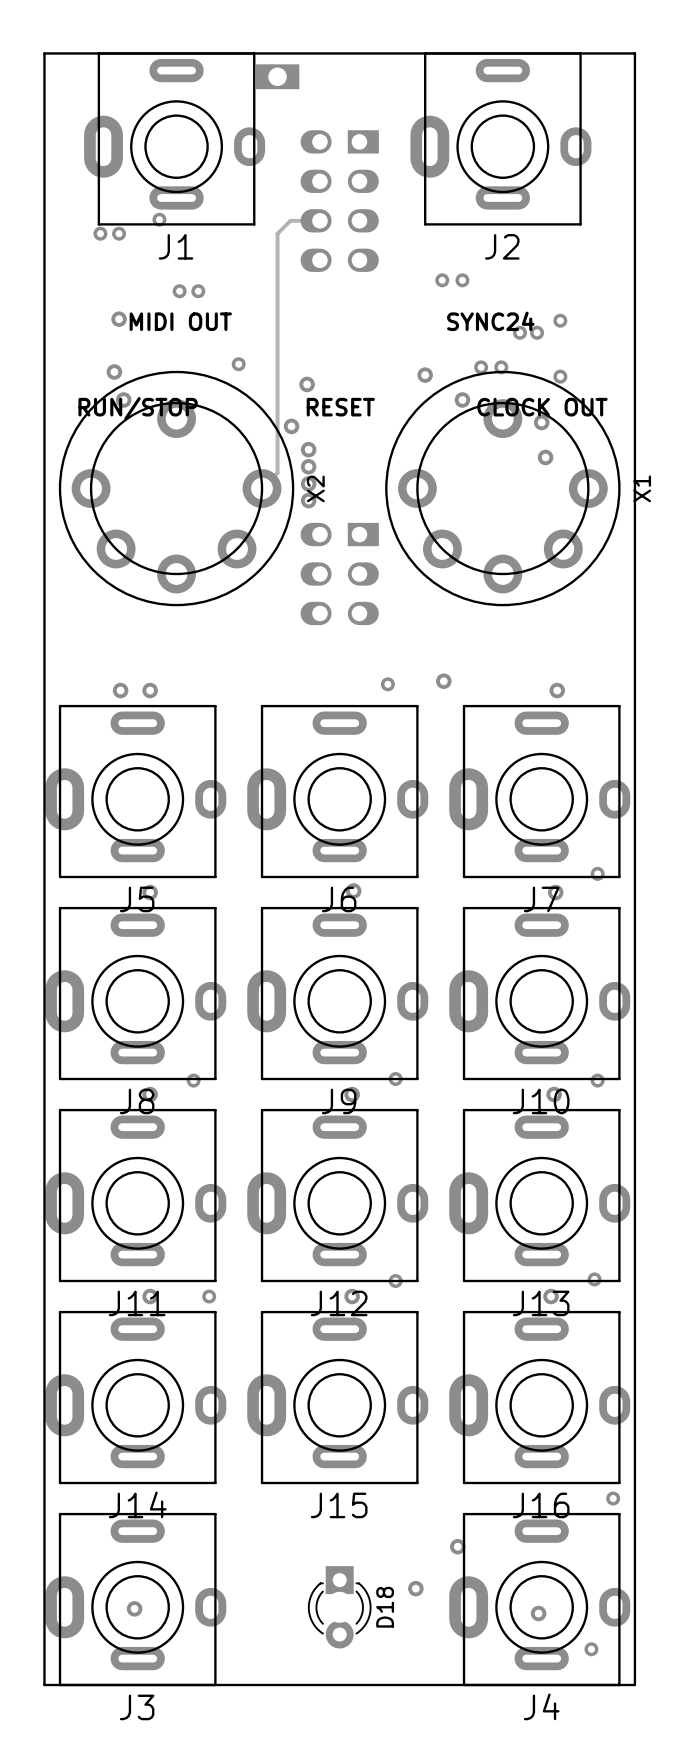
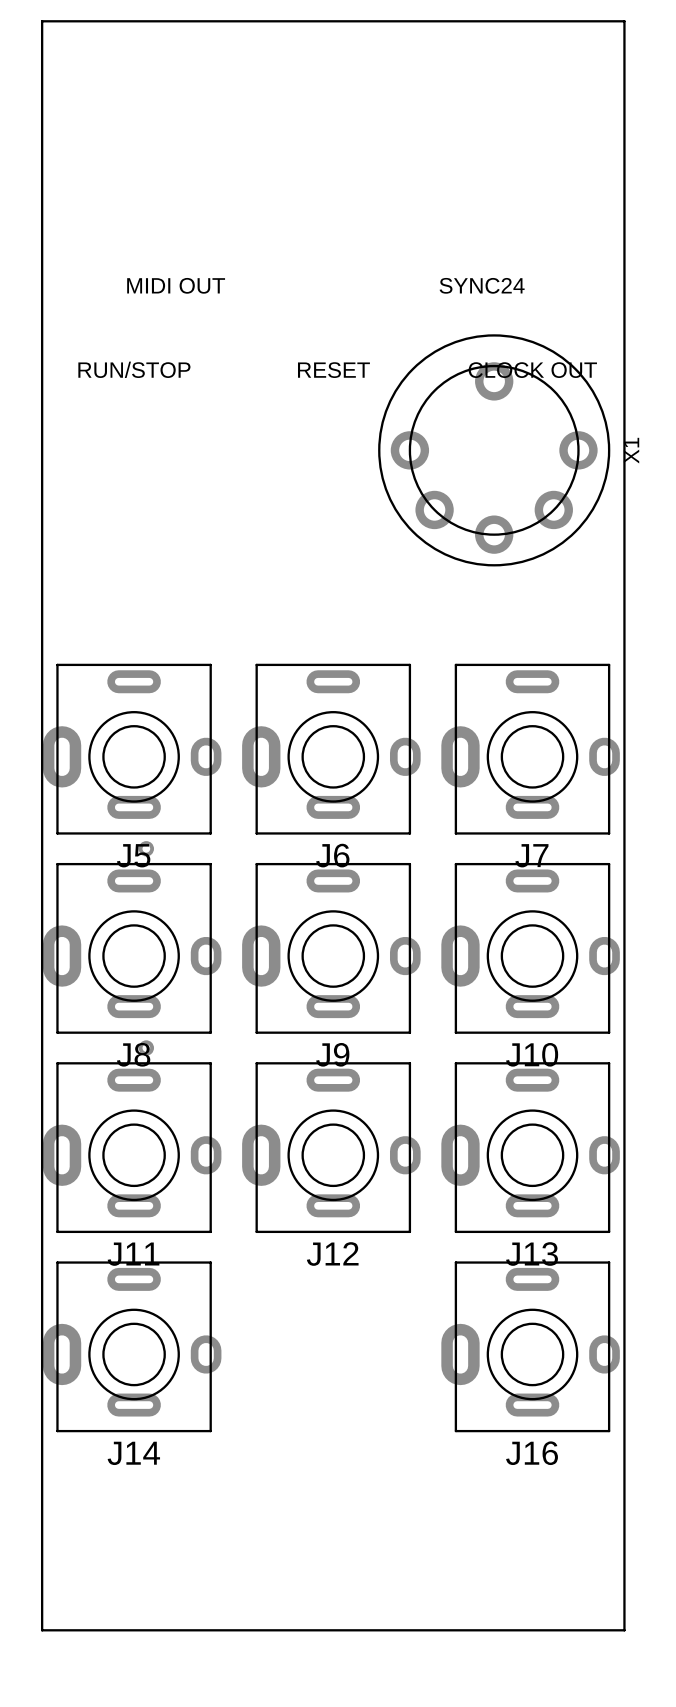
part: (277, 76) -> none
J1: (174, 138) -> none
J2: (500, 138) -> none
part: (339, 201) -> none
via: (159, 219) -> none
track: (319, 220) (290, 220) (277, 233) (277, 473) (262, 488) -> none
via: (100, 233) -> none
via: (119, 233) -> none
via: (442, 280) -> none
via: (462, 280) -> none
via: (179, 291) -> none
via: (198, 291) -> none
via: (119, 319) -> none
via: (560, 320) -> none
via: (519, 332) -> none
via: (537, 332) -> none
via: (238, 364) -> none
via: (481, 367) -> none
via: (501, 367) -> none
via: (114, 372) -> none
via: (425, 375) -> none
via: (560, 376) -> none
via: (307, 384) -> none
via: (123, 399) -> none
via: (462, 399) -> none
via: (541, 422) -> none
via: (291, 426) -> none
via: (308, 449) -> none
via: (545, 457) -> none
via: (308, 466) -> none
via: (308, 483) -> none
X2: (176, 488) -> none
via: (308, 500) -> none
part: (339, 574) -> none
via: (443, 681) -> none
via: (387, 684) -> none
via: (120, 690) -> none
via: (150, 690) -> none
via: (557, 690) -> none
via: (597, 873) -> none
via: (353, 890) -> none
via: (555, 892) -> none
via: (395, 1079) -> none
via: (193, 1080) -> none
via: (597, 1080) -> none
via: (352, 1094) -> none
via: (554, 1094) -> none
via: (594, 1279) -> none
via: (395, 1281) -> none
via: (150, 1296) -> none
via: (209, 1296) -> none
via: (352, 1296) -> none
via: (551, 1296) -> none
J15: (337, 1397) -> none
via: (613, 1498) -> none
via: (457, 1546) -> none
via: (415, 1588) -> none
J3: (135, 1599) -> none
J4: (539, 1599) -> none
D18: (339, 1607) -> none
via: (134, 1608) -> none
via: (538, 1613) -> none
via: (591, 1649) -> none

